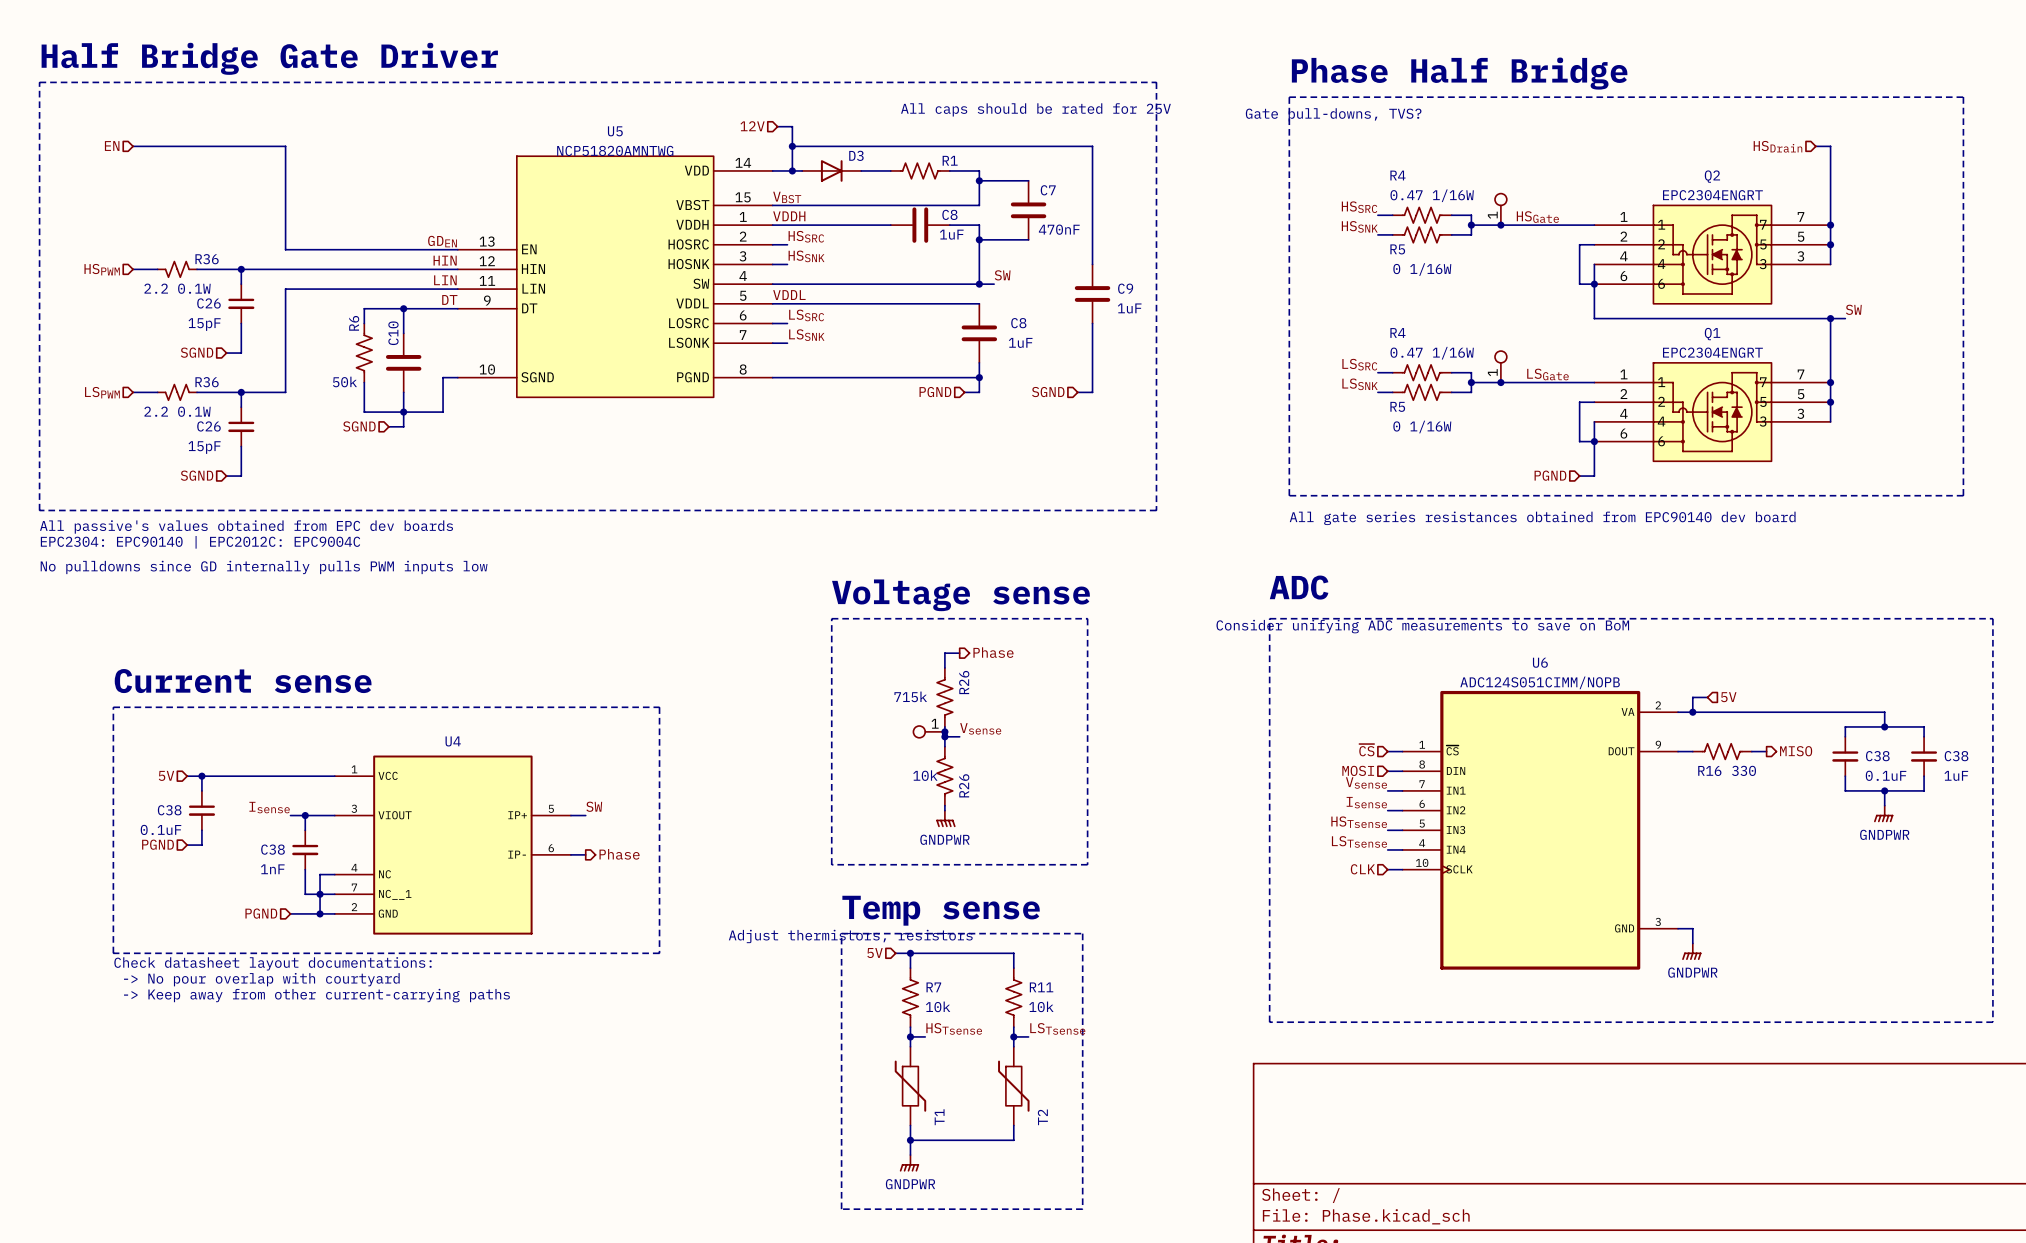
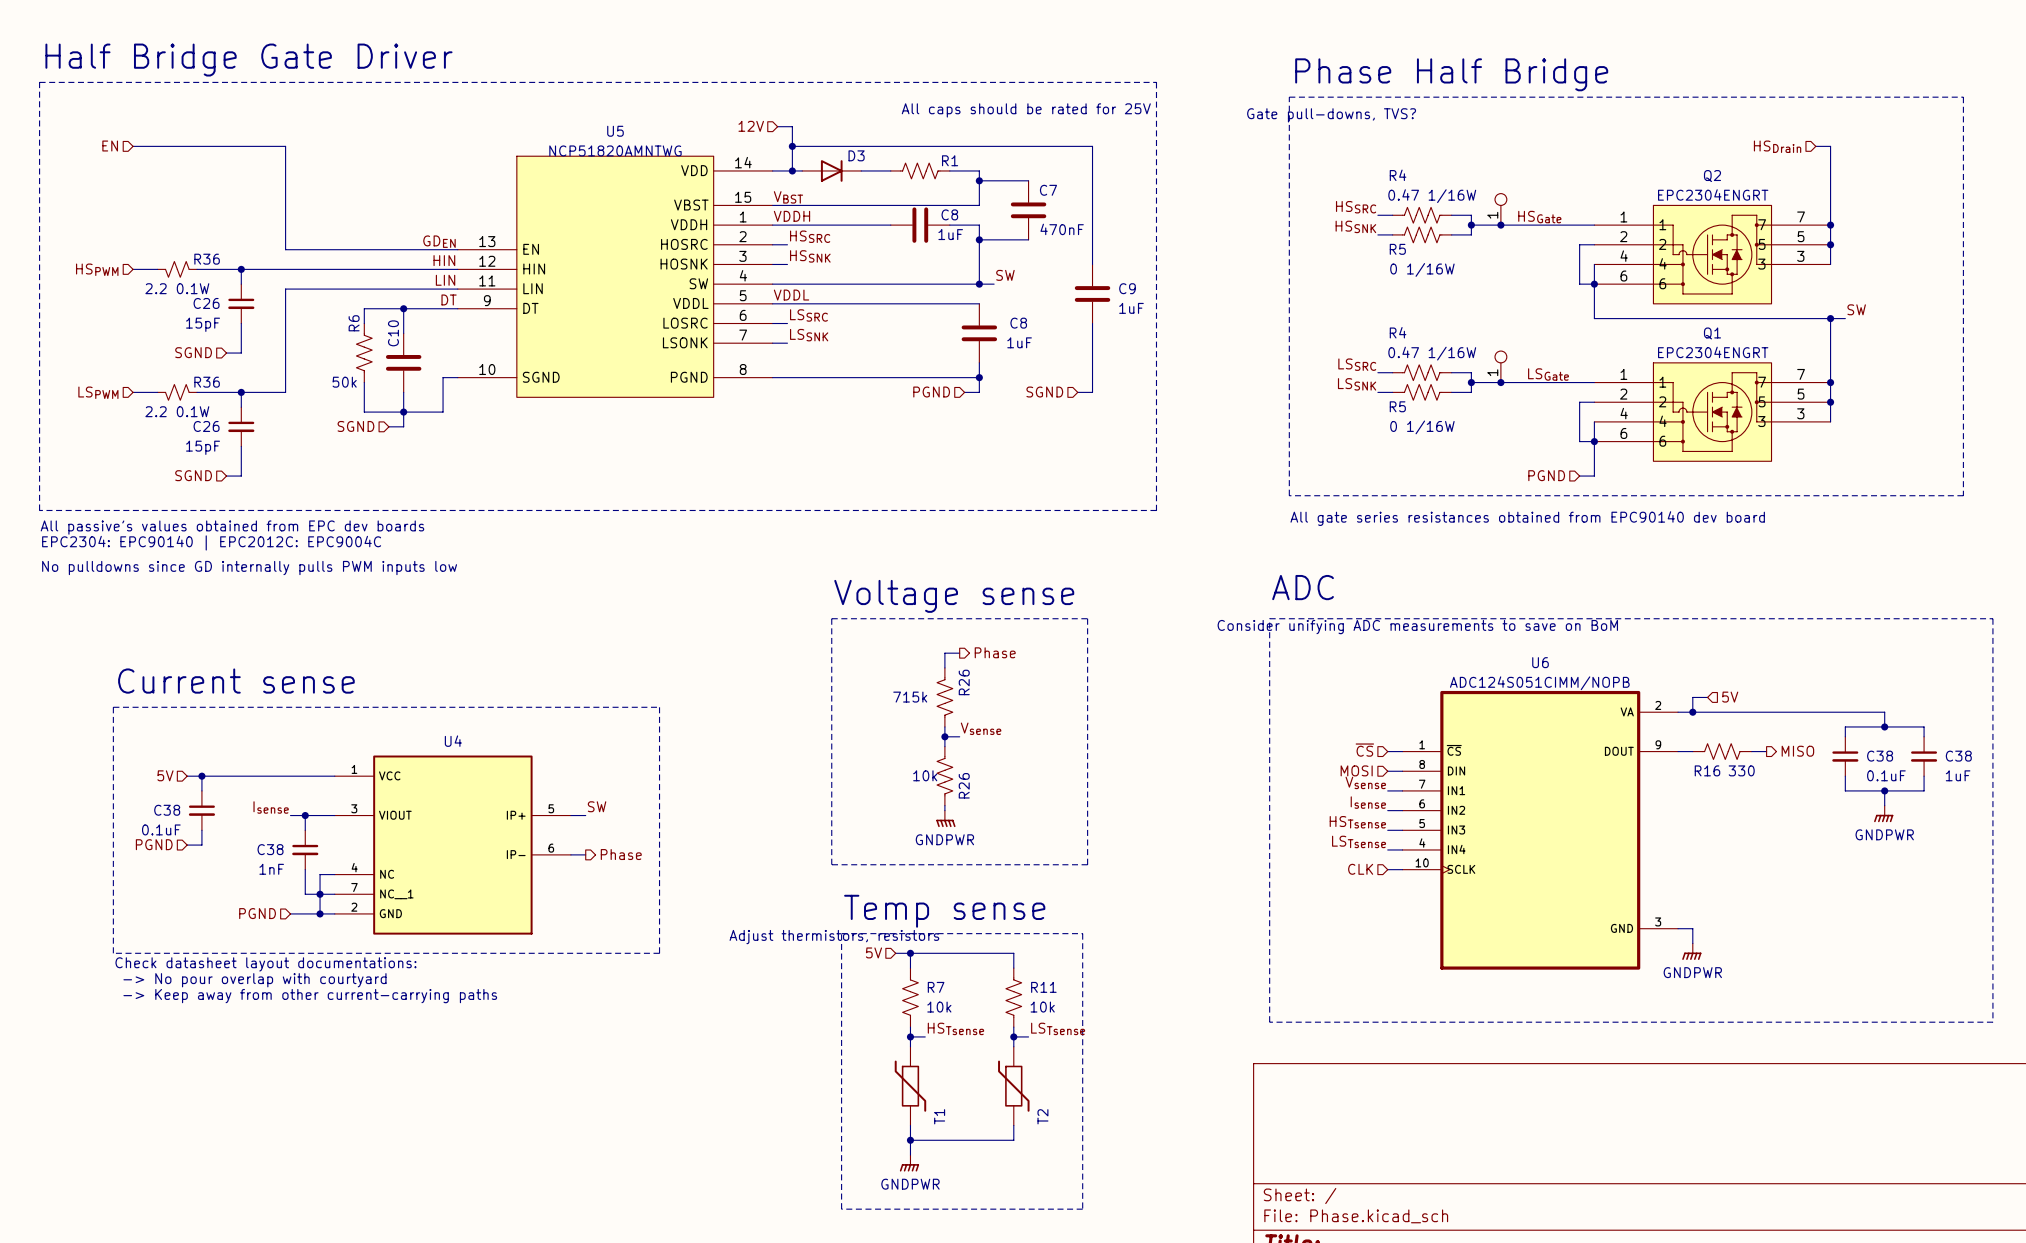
part: (929, 731) -> none
junction: (944, 731) -> none

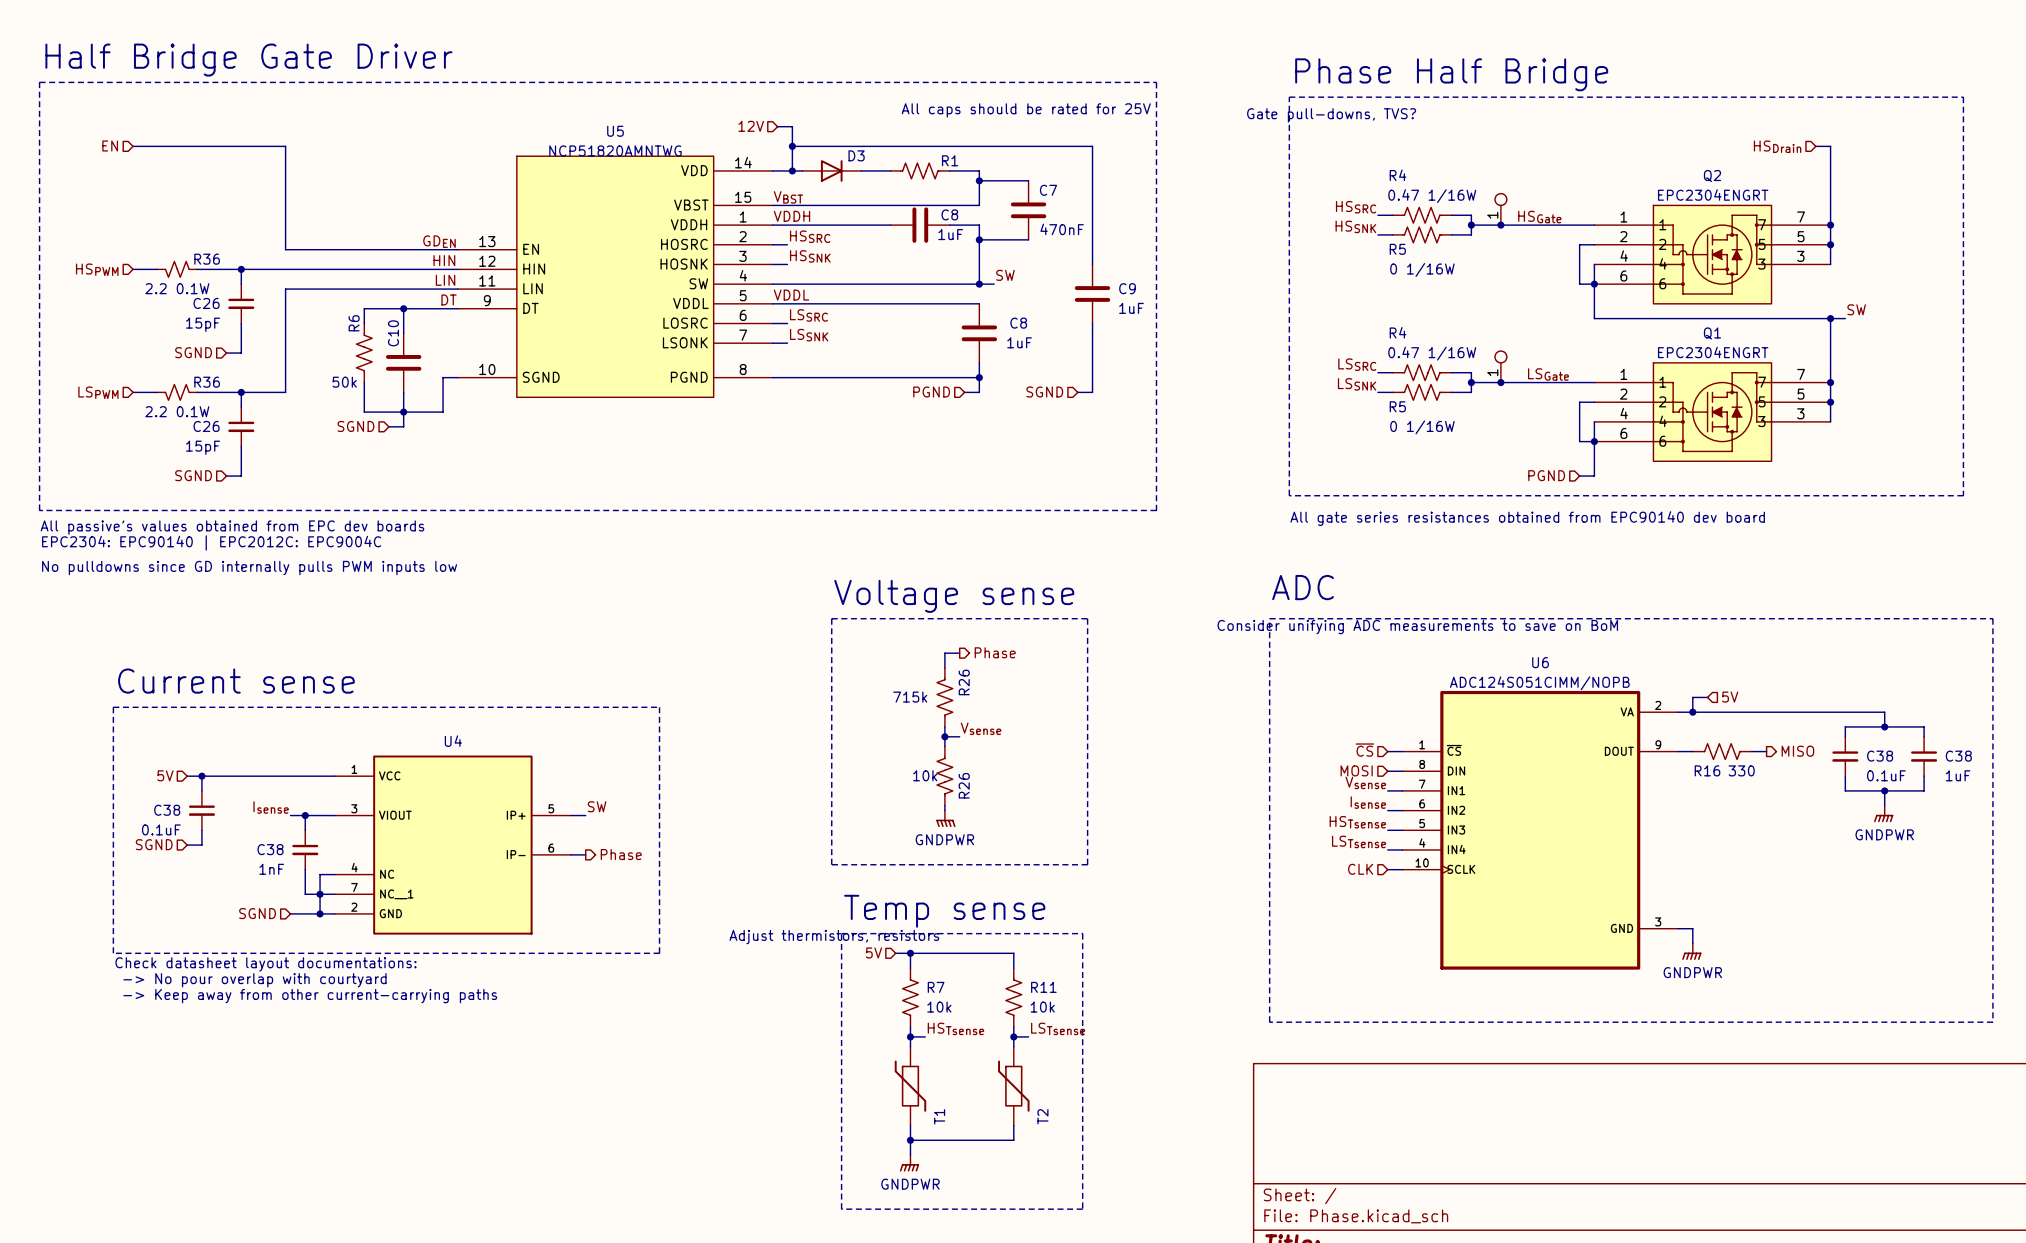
hierarchical label: PGND (154, 844) -> SGND (154, 844)
hierarchical label: PGND (257, 913) -> SGND (257, 913)

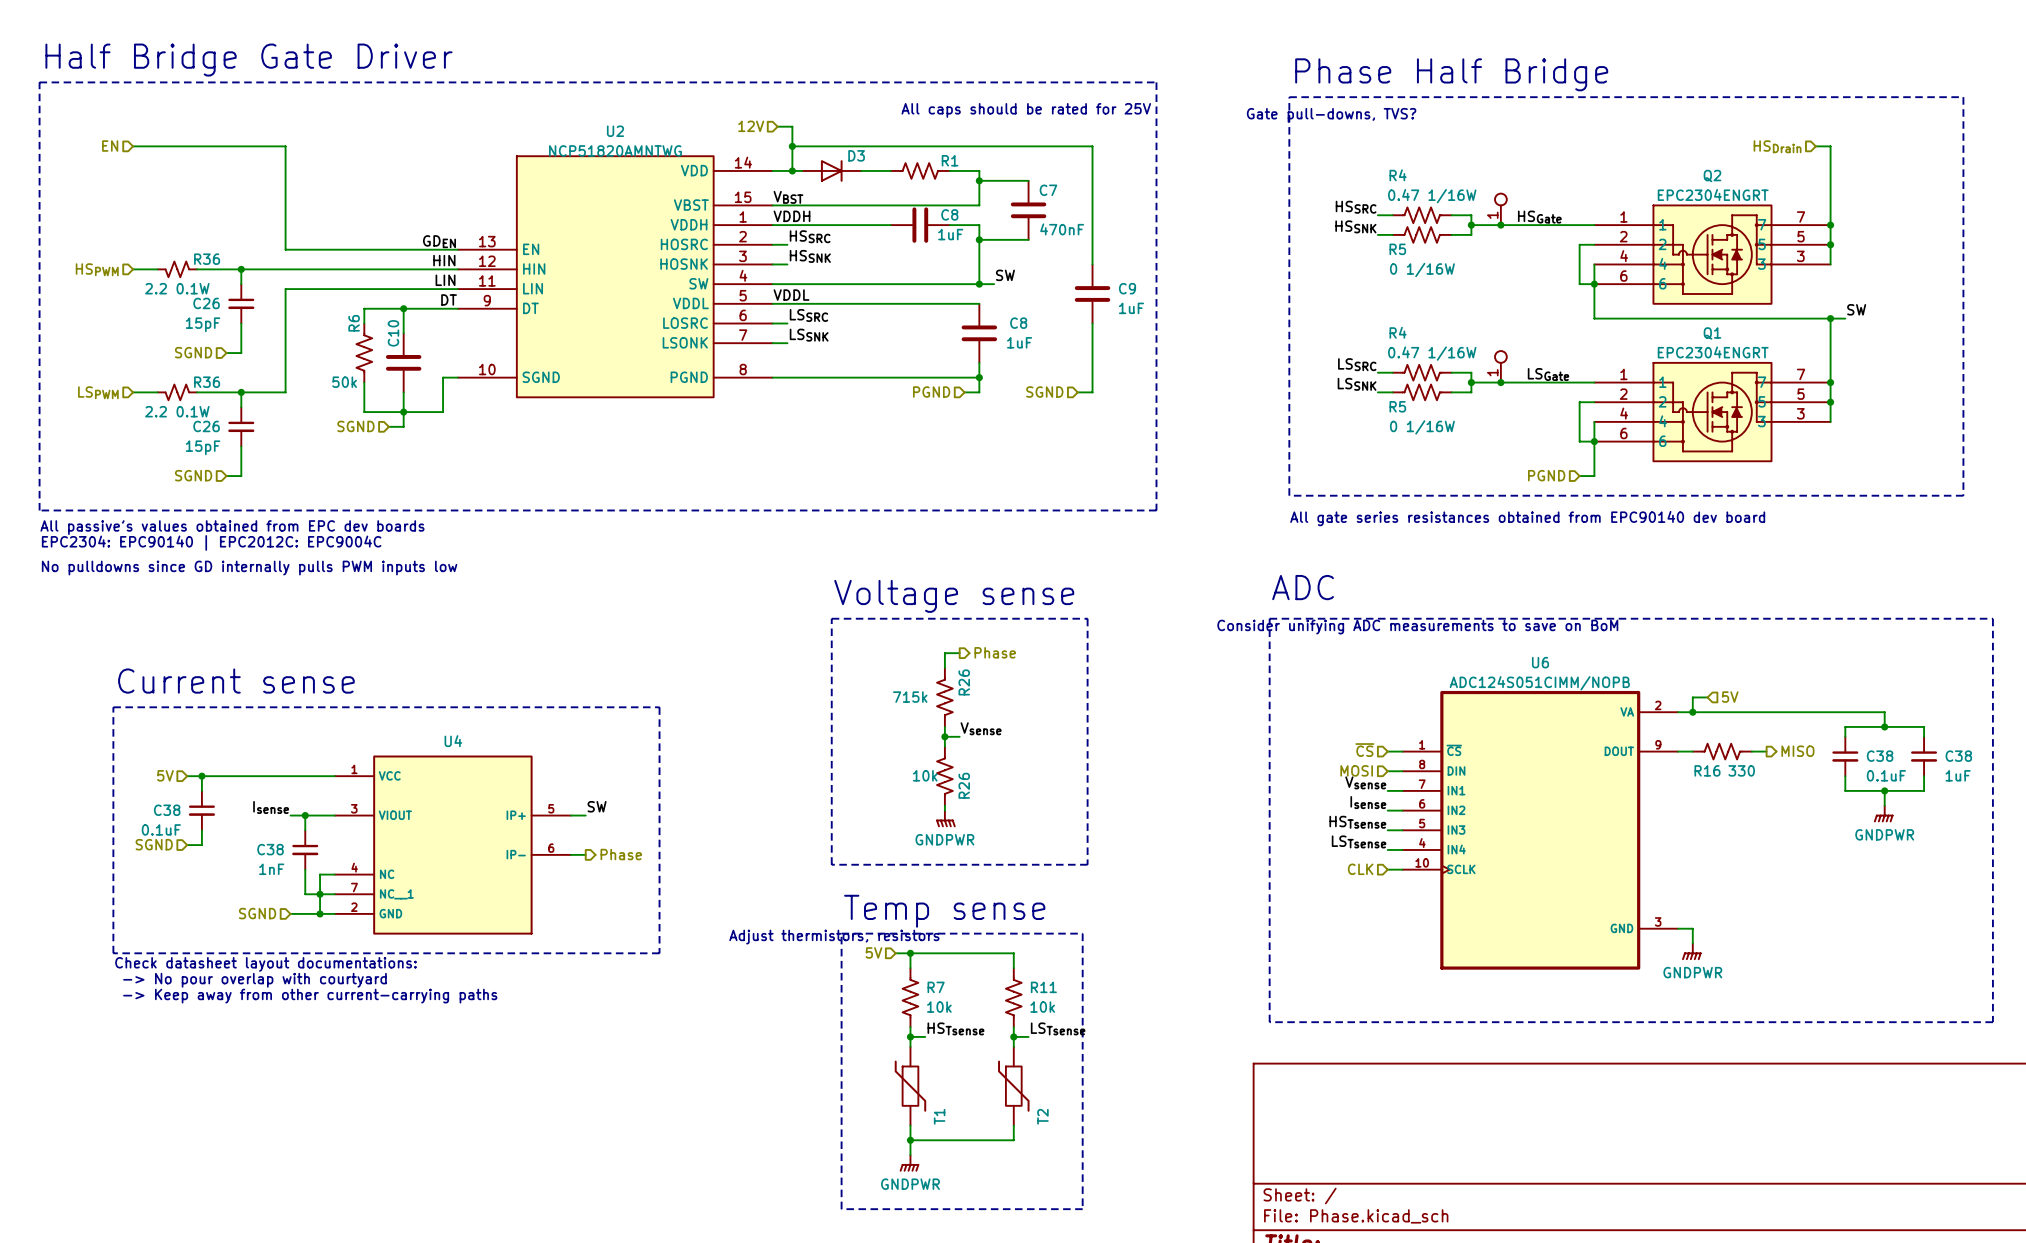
U5 name: U5 (615, 131) -> U2 (615, 131)

